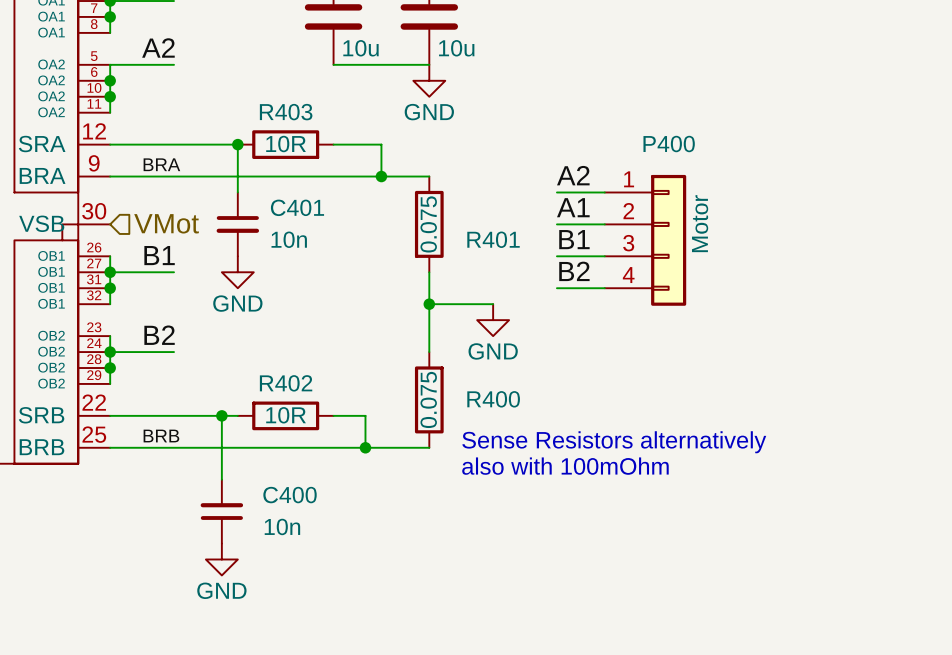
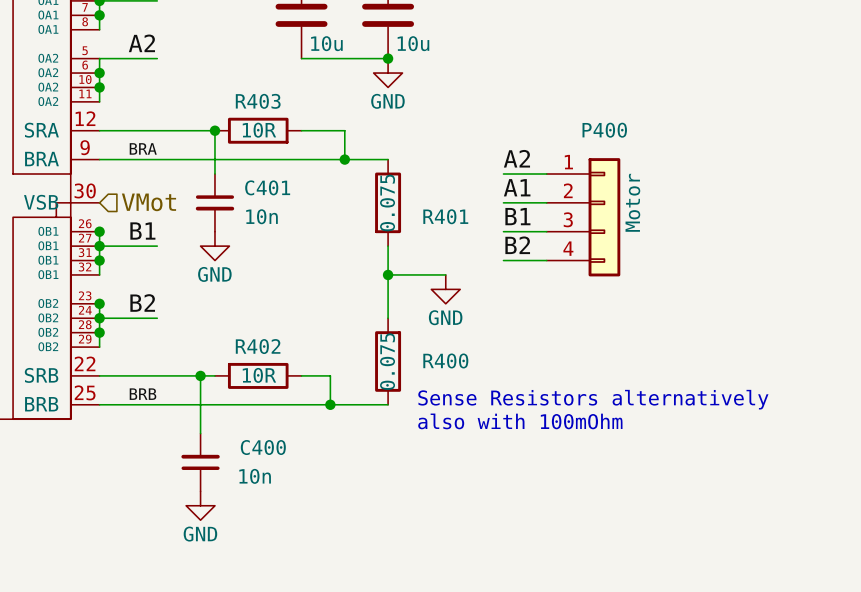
junction: none -> (388, 58)
junction: none -> (99, 231)
junction: none -> (99, 303)

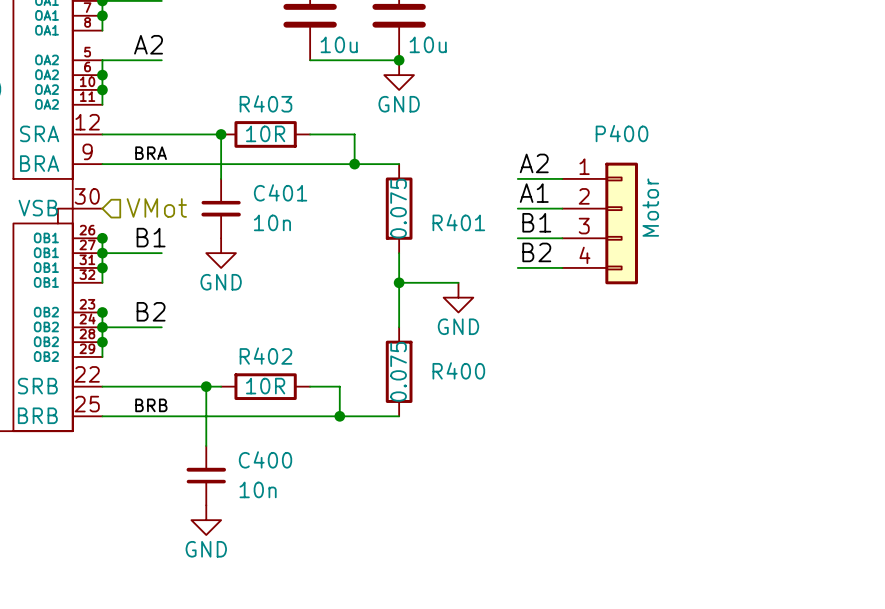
text: Sense Resistors alternatively (593, 399) -> none
text: also with 100mOhm (520, 421) -> none

